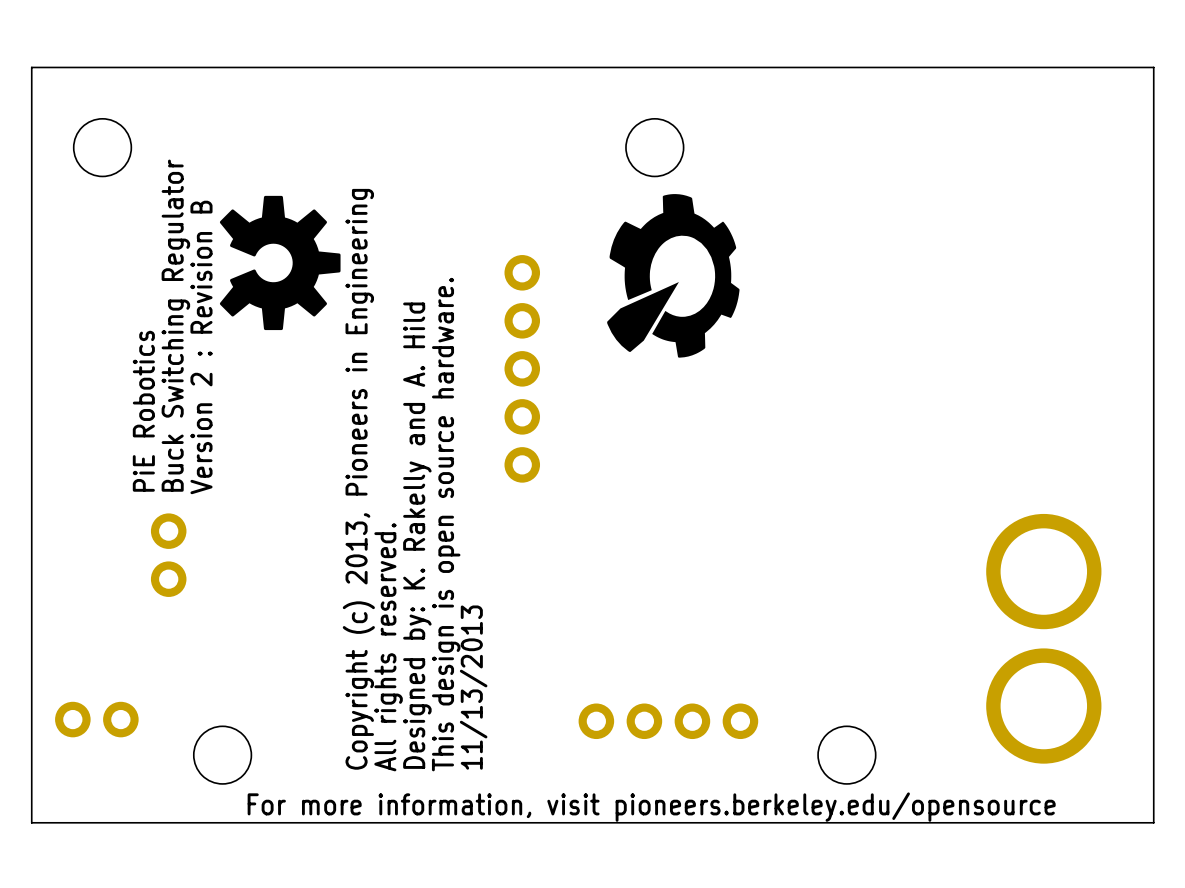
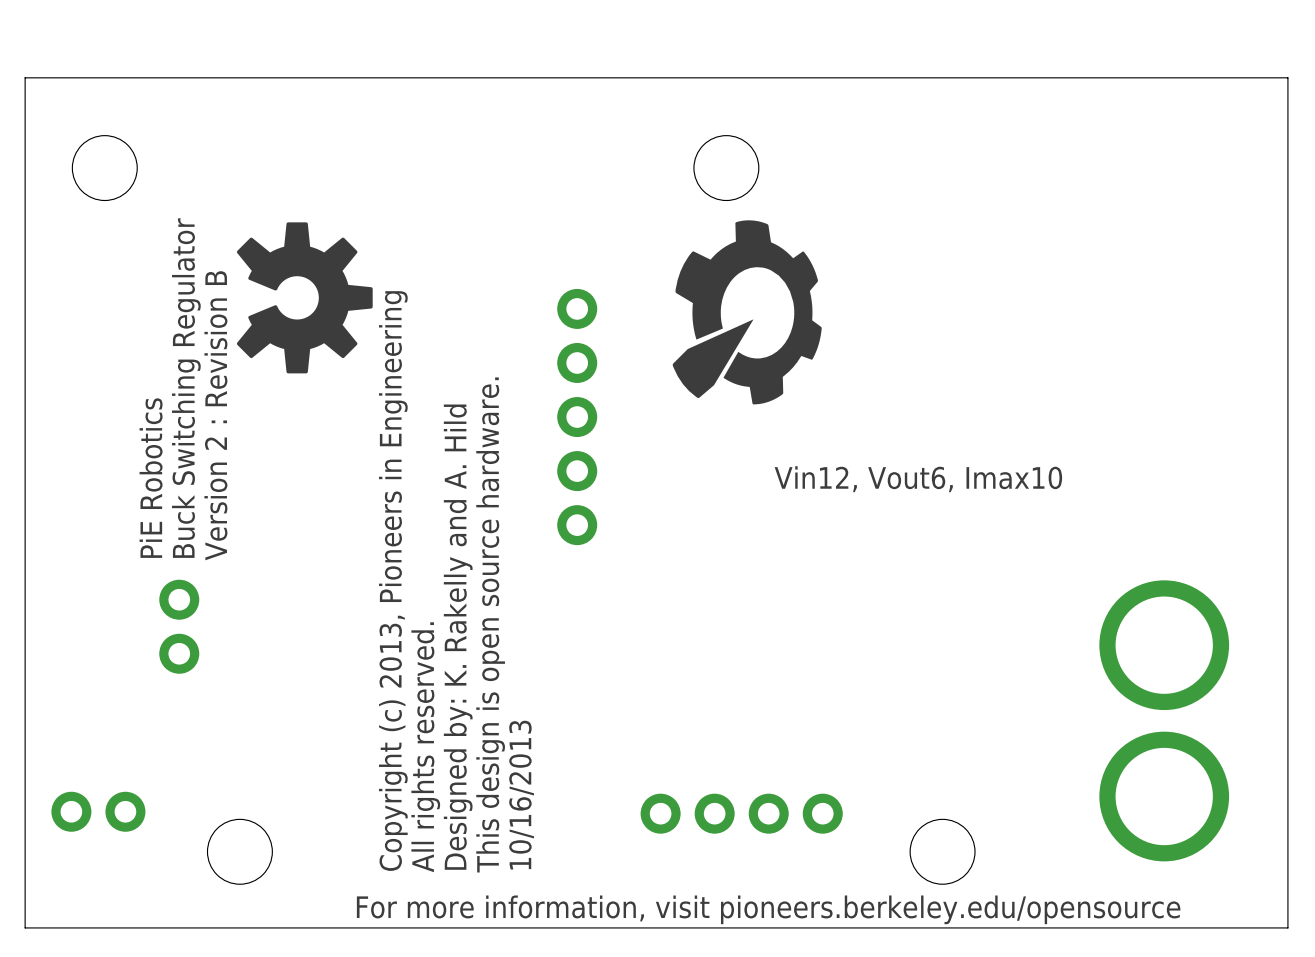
text: none -> Vin12, Vout6, Imax10 (918, 479)
text: 11/13/2013 (473, 687) -> 10/16/2013 (521, 795)

